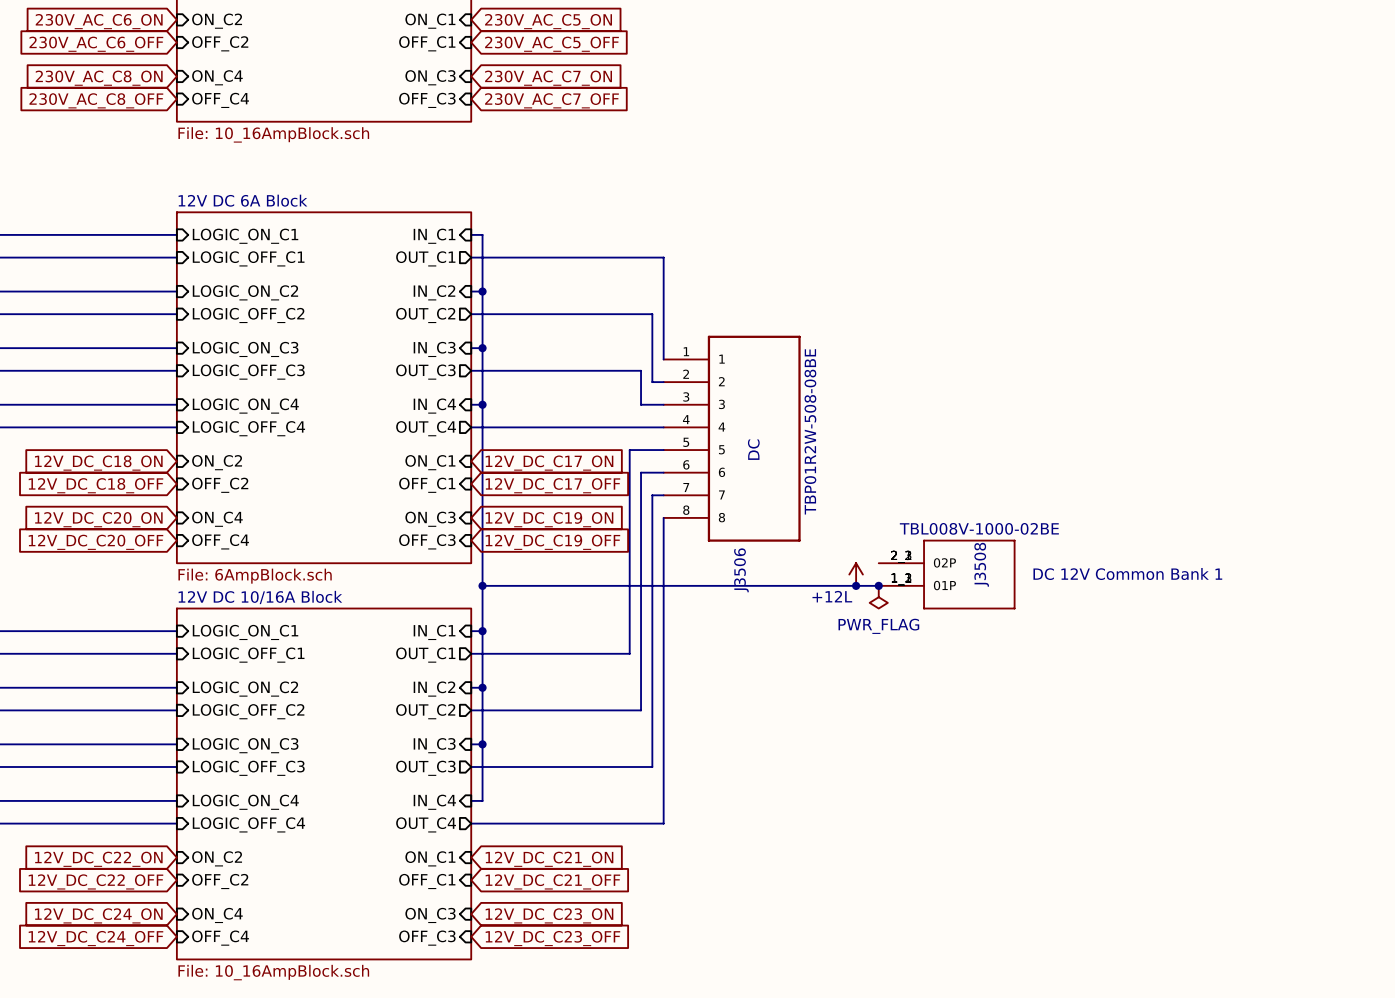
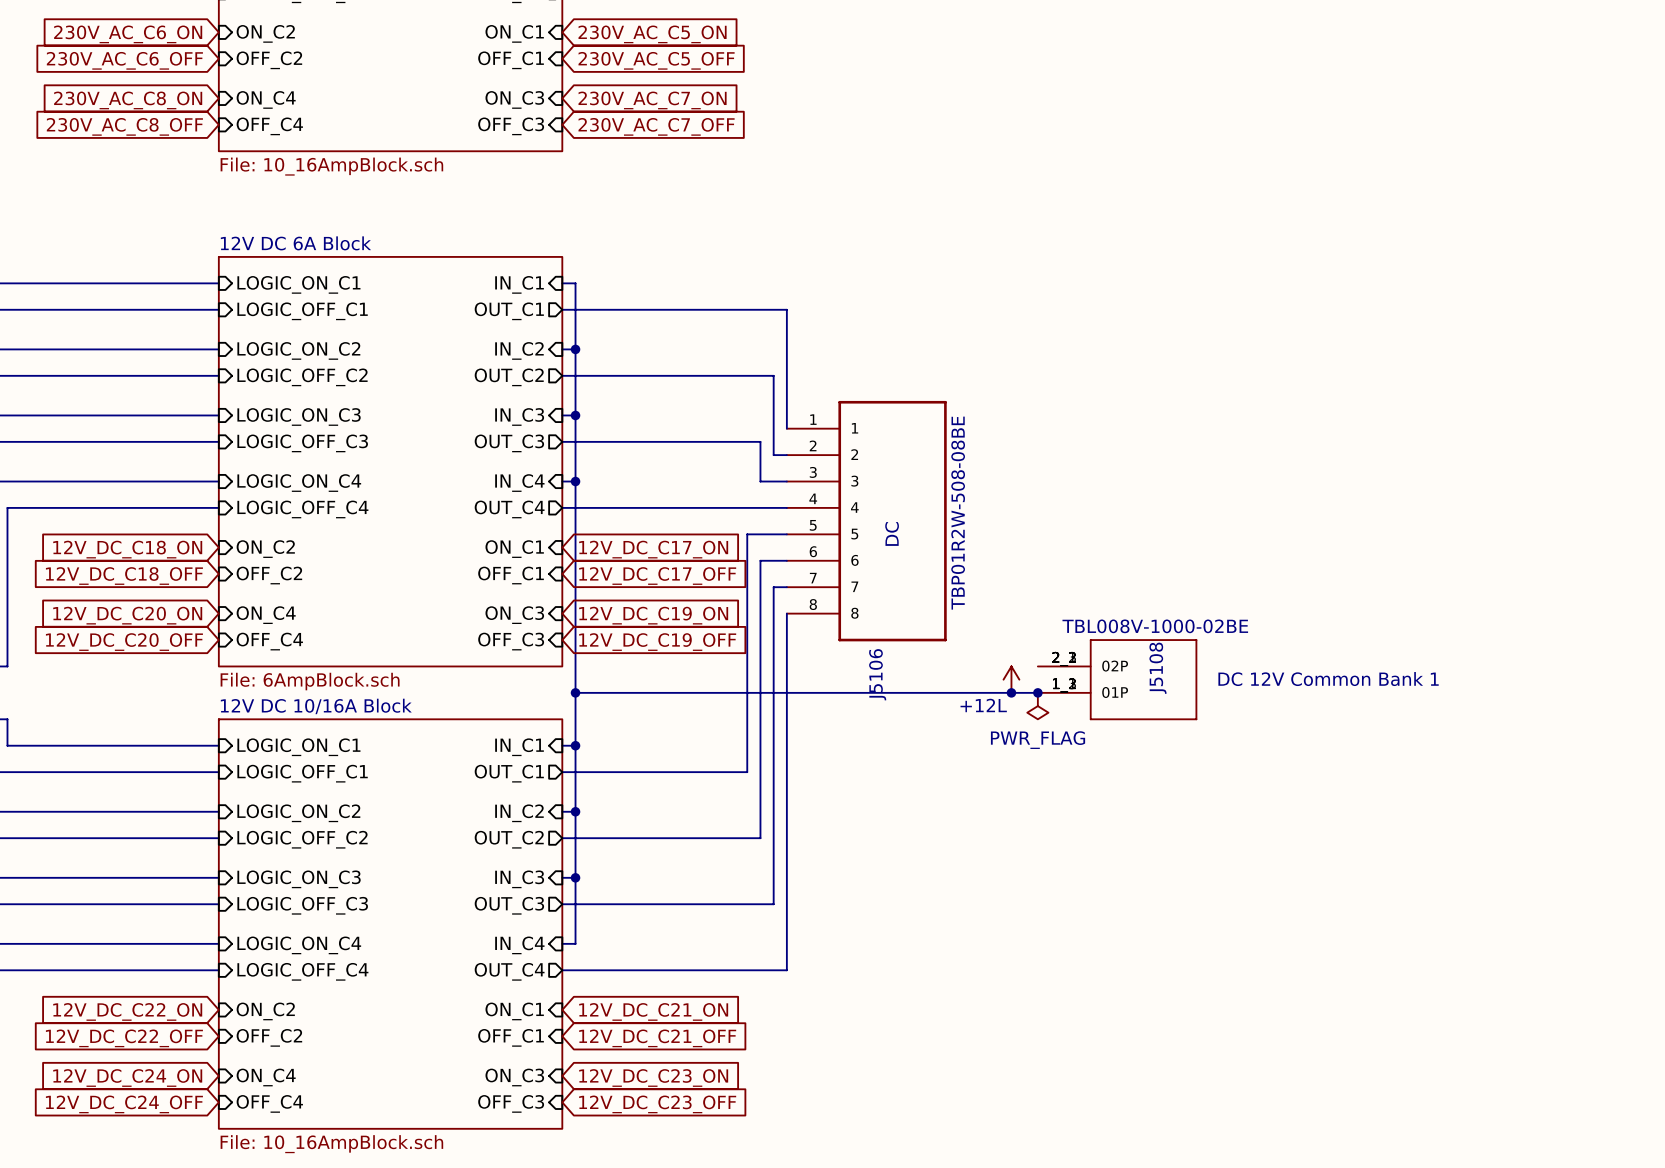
J3508 name: J3508 (981, 564) -> J5108 (1157, 668)
J3506 name: J3506 (741, 570) -> J5106 (877, 674)

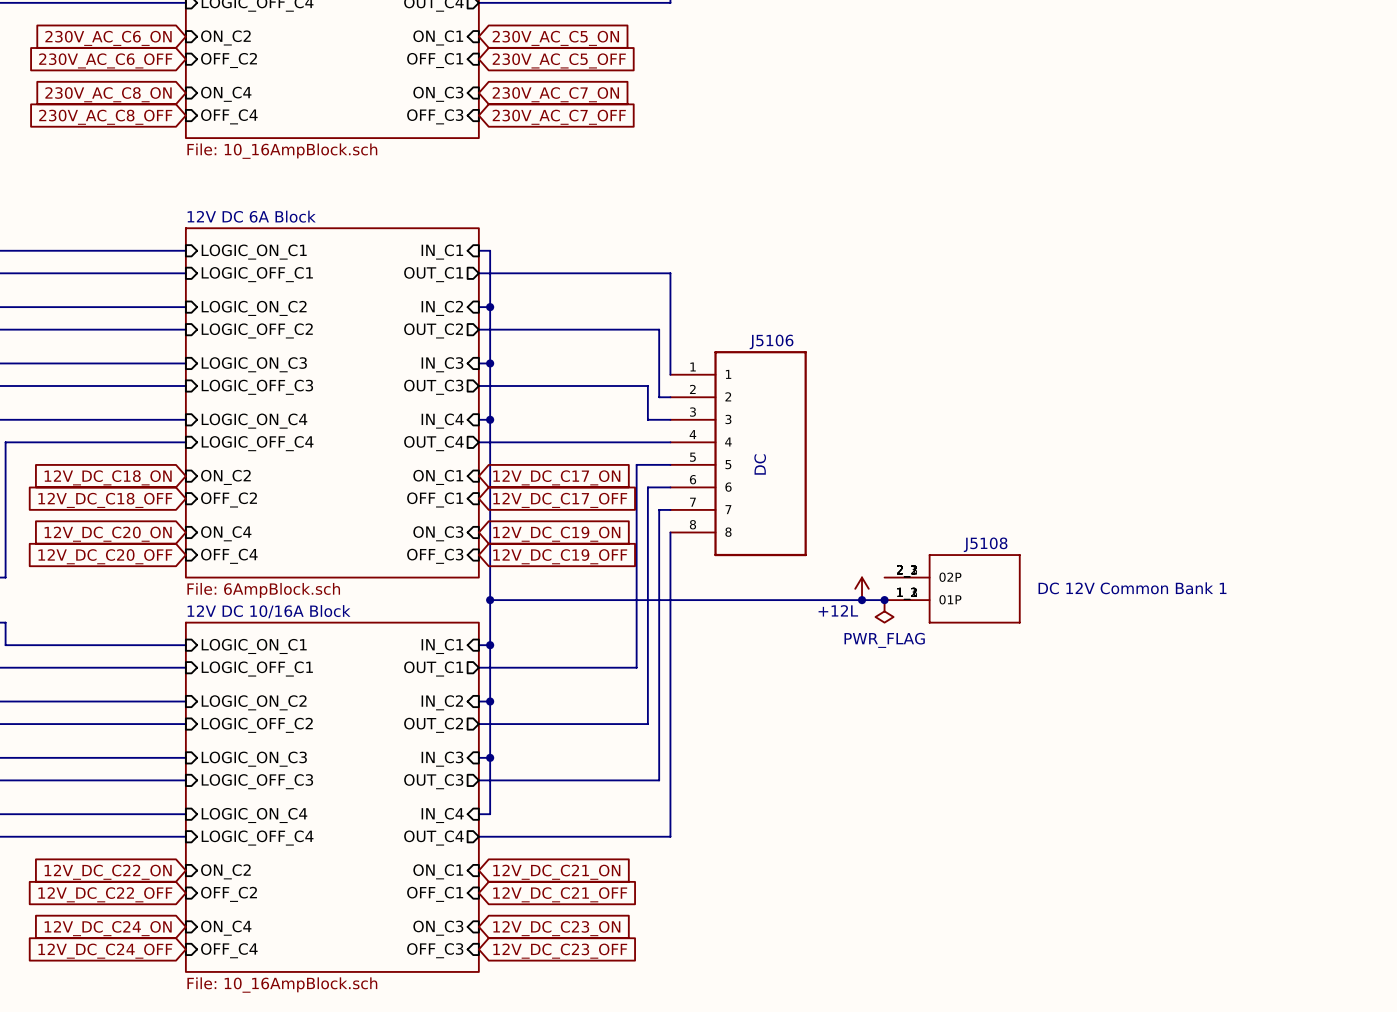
J5106 value: TBP01R2W-508-08BE (958, 513) -> none
J5108 value: TBL008V-1000-02BE (1155, 626) -> none
J5108 name rotation: 0° (1157, 668) -> 90° clockwise (985, 544)
J5106 name rotation: 0° (877, 674) -> 90° clockwise (771, 341)
J5106 name position: J5106 (877, 674) -> J5106 (771, 341)

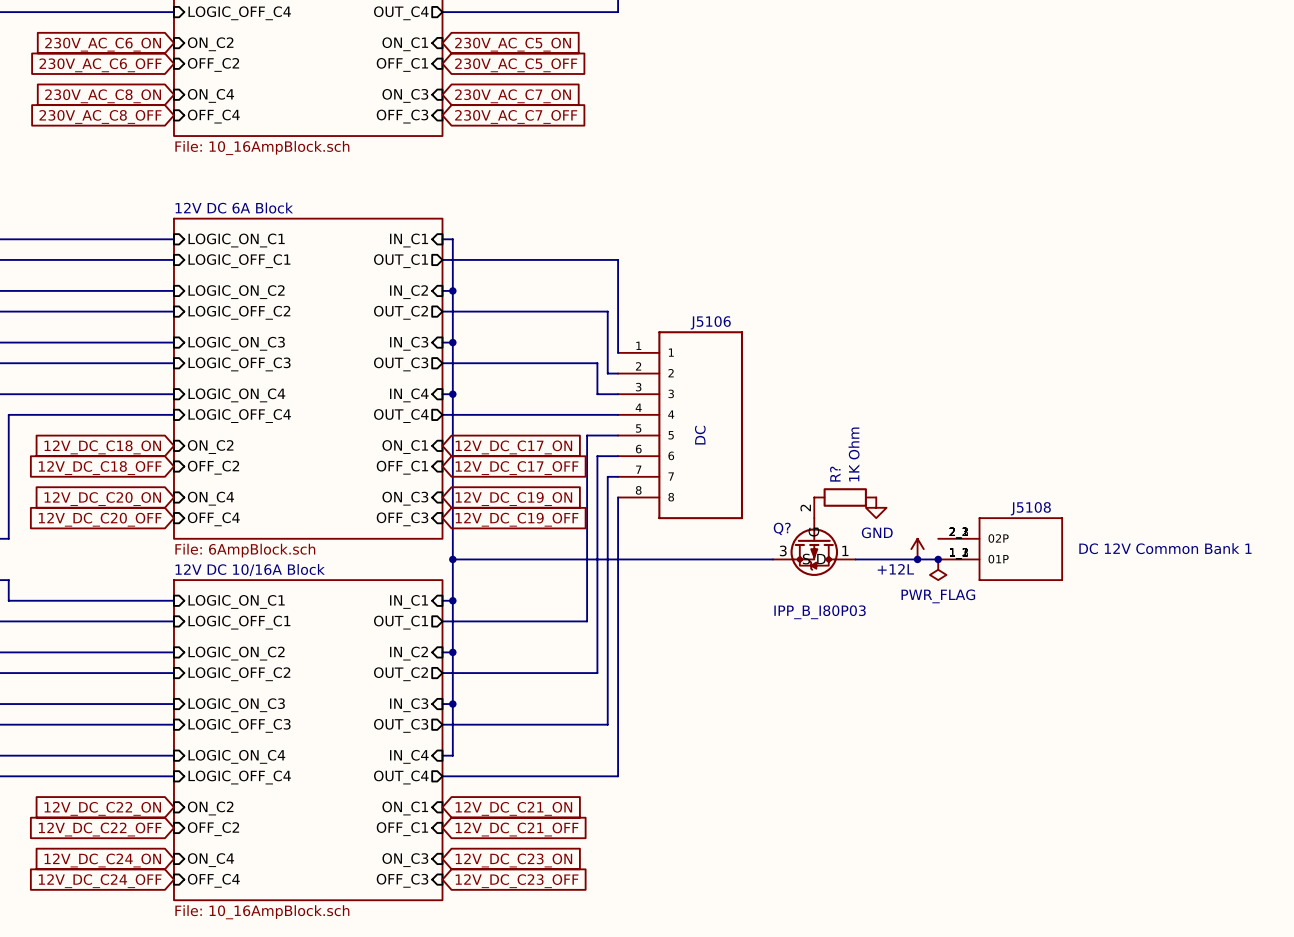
R?: none -> 1K Ohm (845, 497)
power symbol: none -> GND (876, 507)
Q?: none -> IPP_B_I80P03 (814, 536)
power symbol position: +12L (862, 588) -> +12L (917, 549)
J5108 position: (952, 588) -> (1000, 549)
junction: (862, 600) -> none
junction: (884, 600) -> none
wire: none -> (855, 559) (938, 559)
junction: none -> (917, 559)
junction: none -> (938, 559)
power symbol position: PWR_FLAG (884, 611) -> PWR_FLAG (938, 569)

